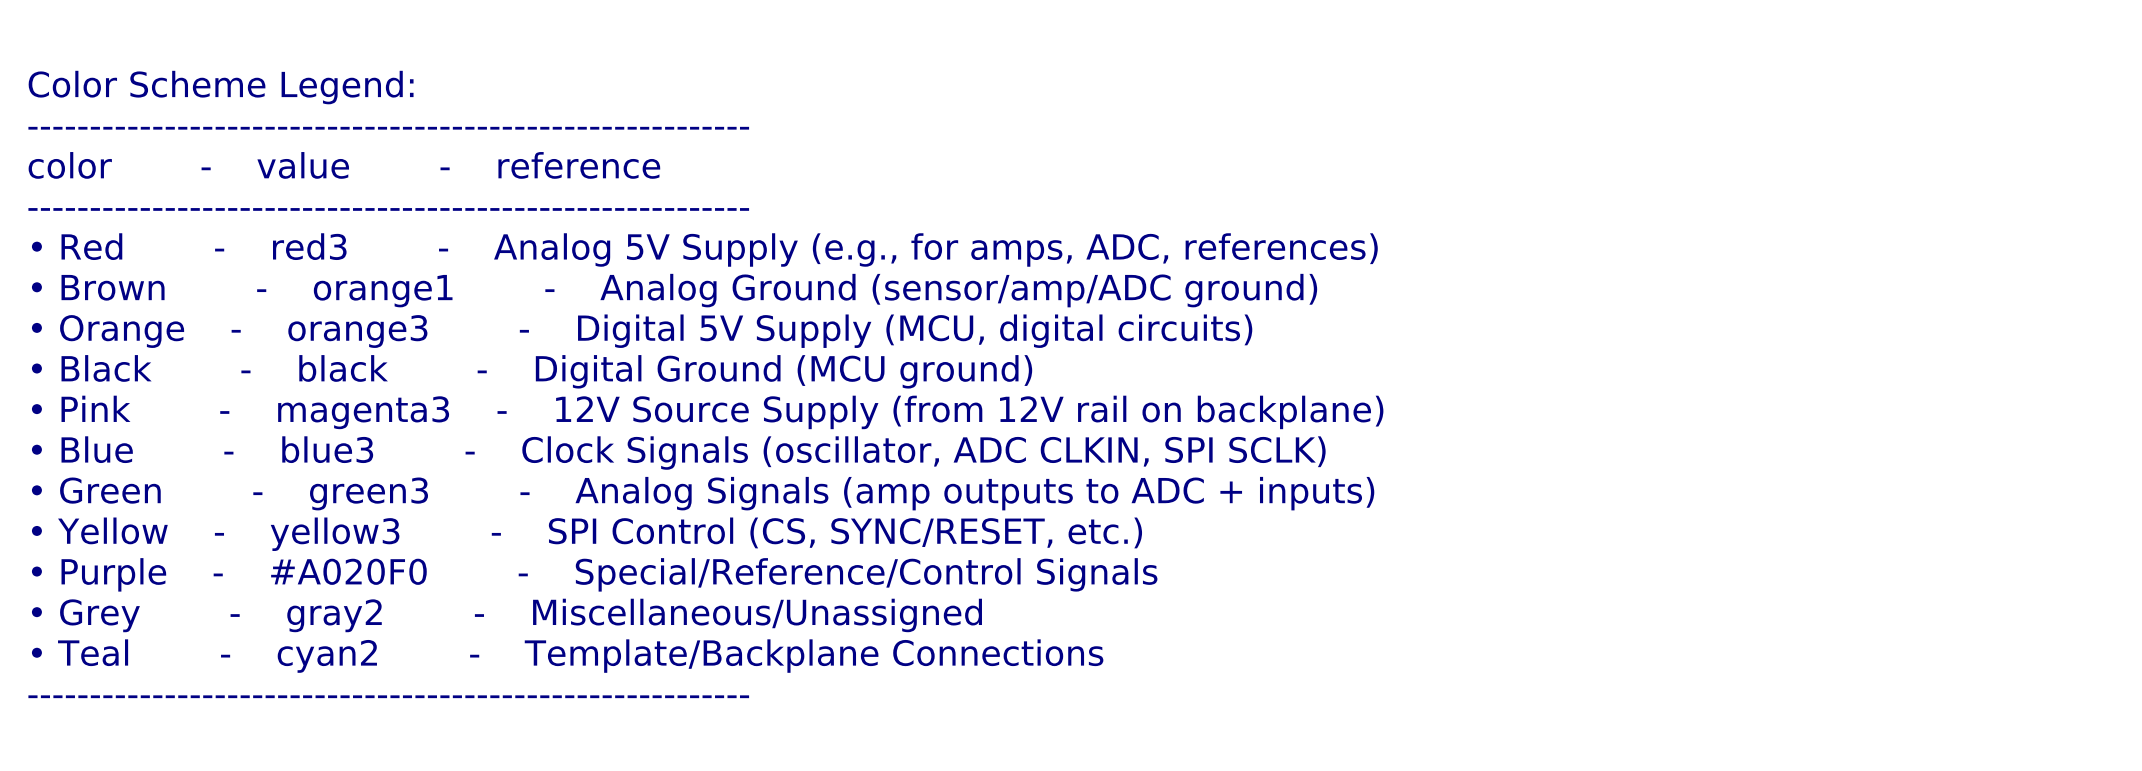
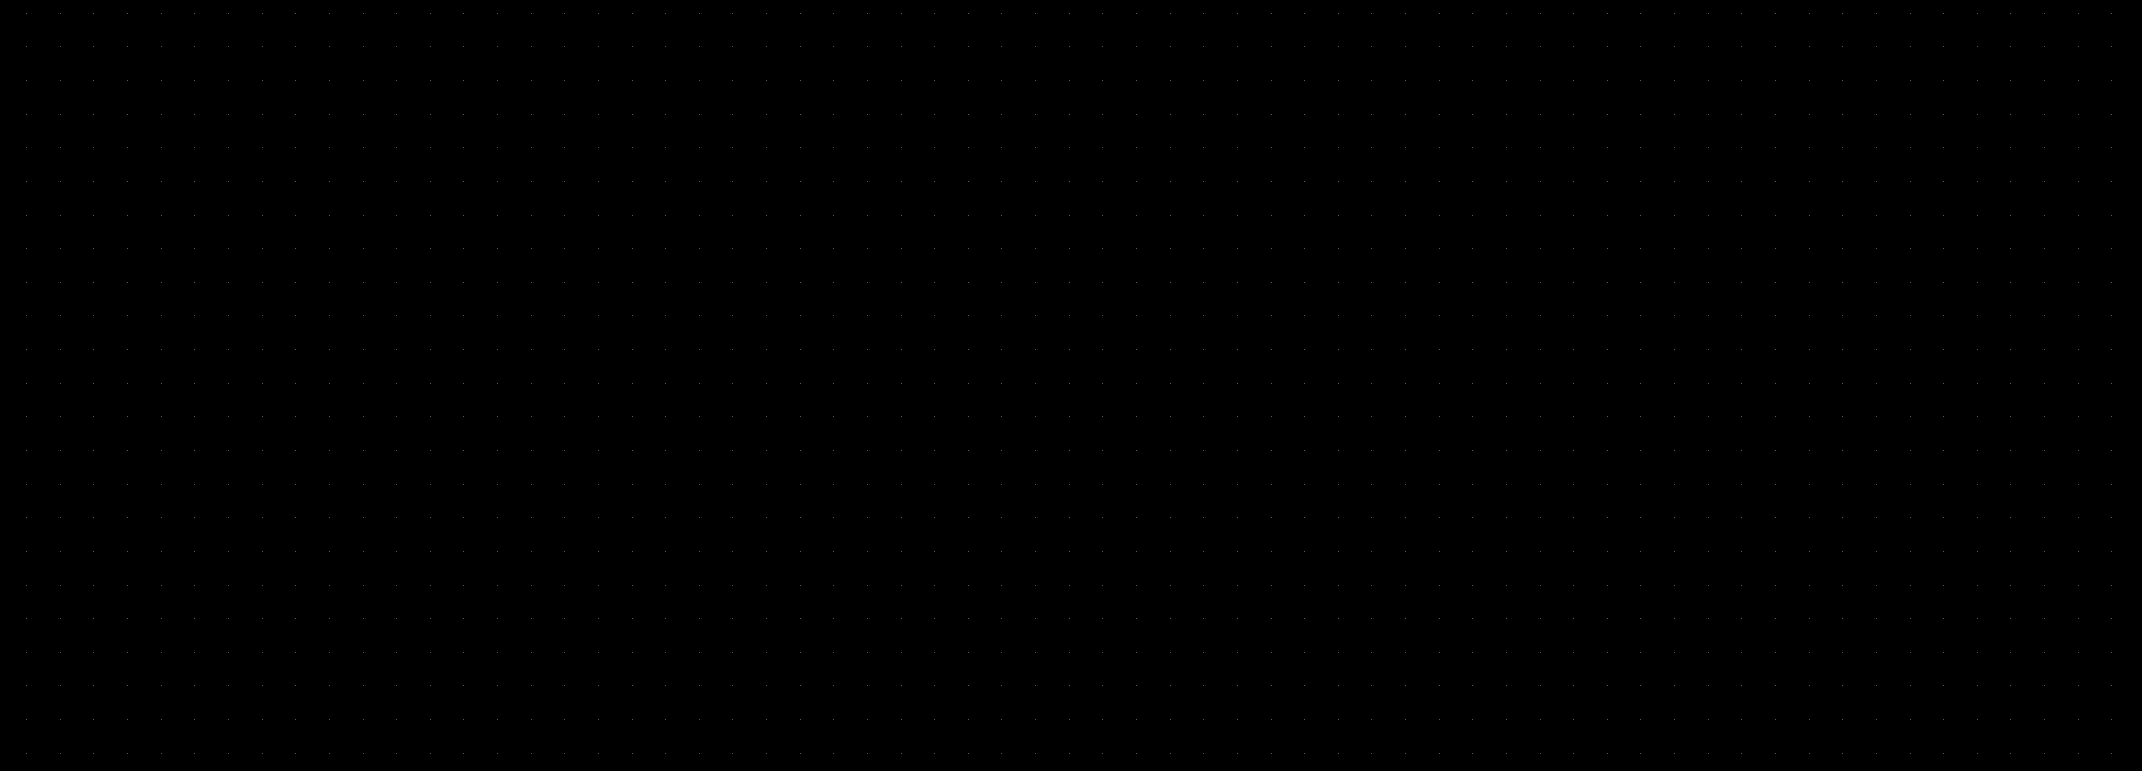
text: Color Scheme Legend: (221, 87) -> none
text: ---------------------------------------------------------- (388, 128) -> none
text: color - value - reference (344, 165) -> none
text: ---------------------------------------------------------- (388, 209) -> none
text: • Red - red3 - Analog 5V Supply (e.g., for amps, ADC, references) (704, 249) -> none
text: • Brown - orange1 - Analog Ground (sensor/amp/ADC ground) (674, 290) -> none
text: • Orange - orange3 - Digital 5V Supply (MCU, digital circuits) (642, 331) -> none
text: • Black - black - Digital Ground (MCU ground) (532, 371) -> none
text: • Pink - magenta3 - 12V Source Supply (from 12V rail on backplane) (707, 412) -> none
text: • Blue - blue3 - Clock Signals (oscillator, ADC CLKIN, SPI SCLK) (678, 453) -> none
text: • Green - green3 - Analog Signals (amp outputs to ADC + inputs) (703, 493) -> none
text: • Yellow - yellow3 - SPI Control (CS, SYNC/RESET, etc.) (586, 534) -> none
text: • Purple - #A020F0 - Special/Reference/Control Signals (594, 574) -> none
text: • Grey - gray2 - Miscellaneous/Unassigned (506, 615) -> none
text: • Teal - cyan2 - Template/Backplane Connections (567, 656) -> none
text: ---------------------------------------------------------- (388, 696) -> none

